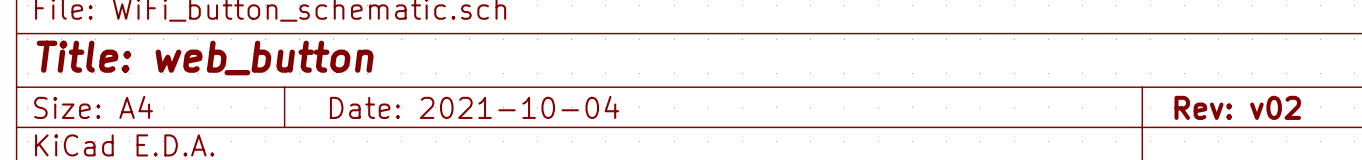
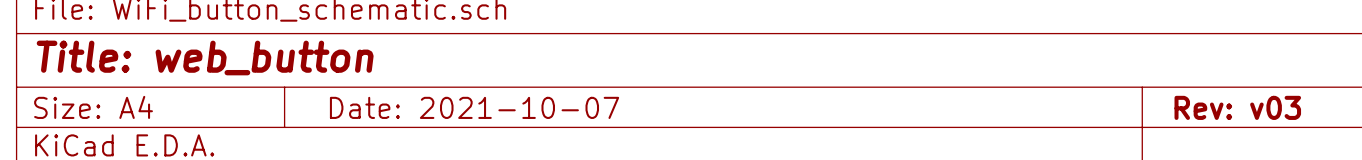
title block: Date: 2021-10-04 (474, 107) -> Date: 2021-10-07 (474, 107)
title block: Rev: v02 (1237, 107) -> Rev: v03 (1237, 107)

